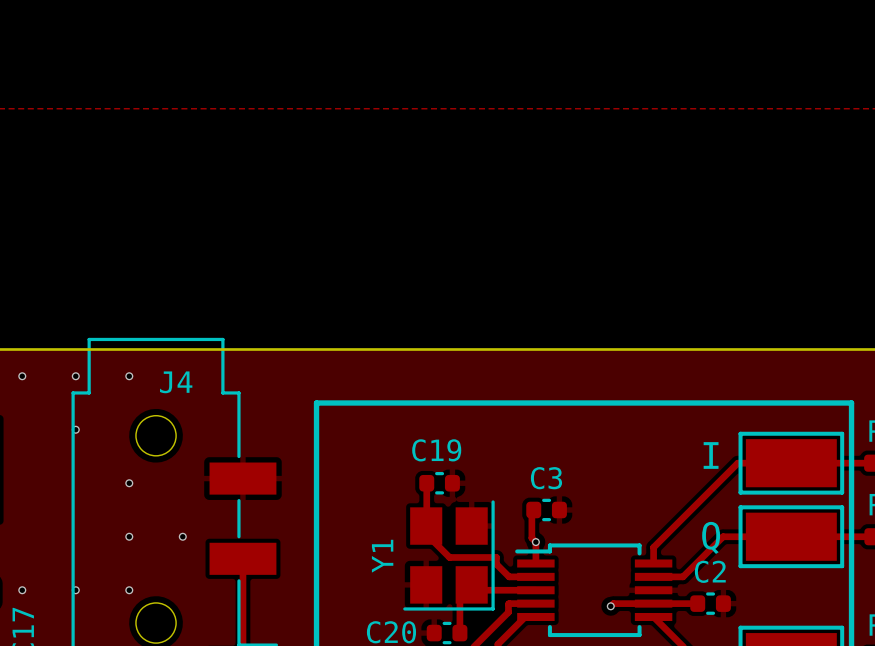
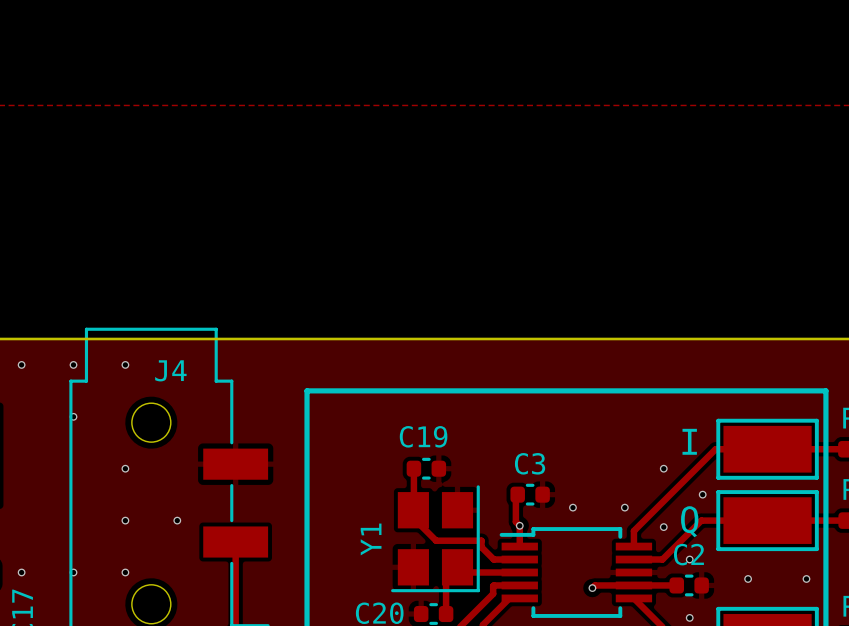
via: none -> (663, 468)
via: none -> (702, 494)
via: none -> (572, 507)
via: none -> (624, 507)
via: none -> (663, 527)
via: none -> (689, 559)
via: none -> (748, 578)
via: none -> (806, 578)
via: none -> (689, 617)

